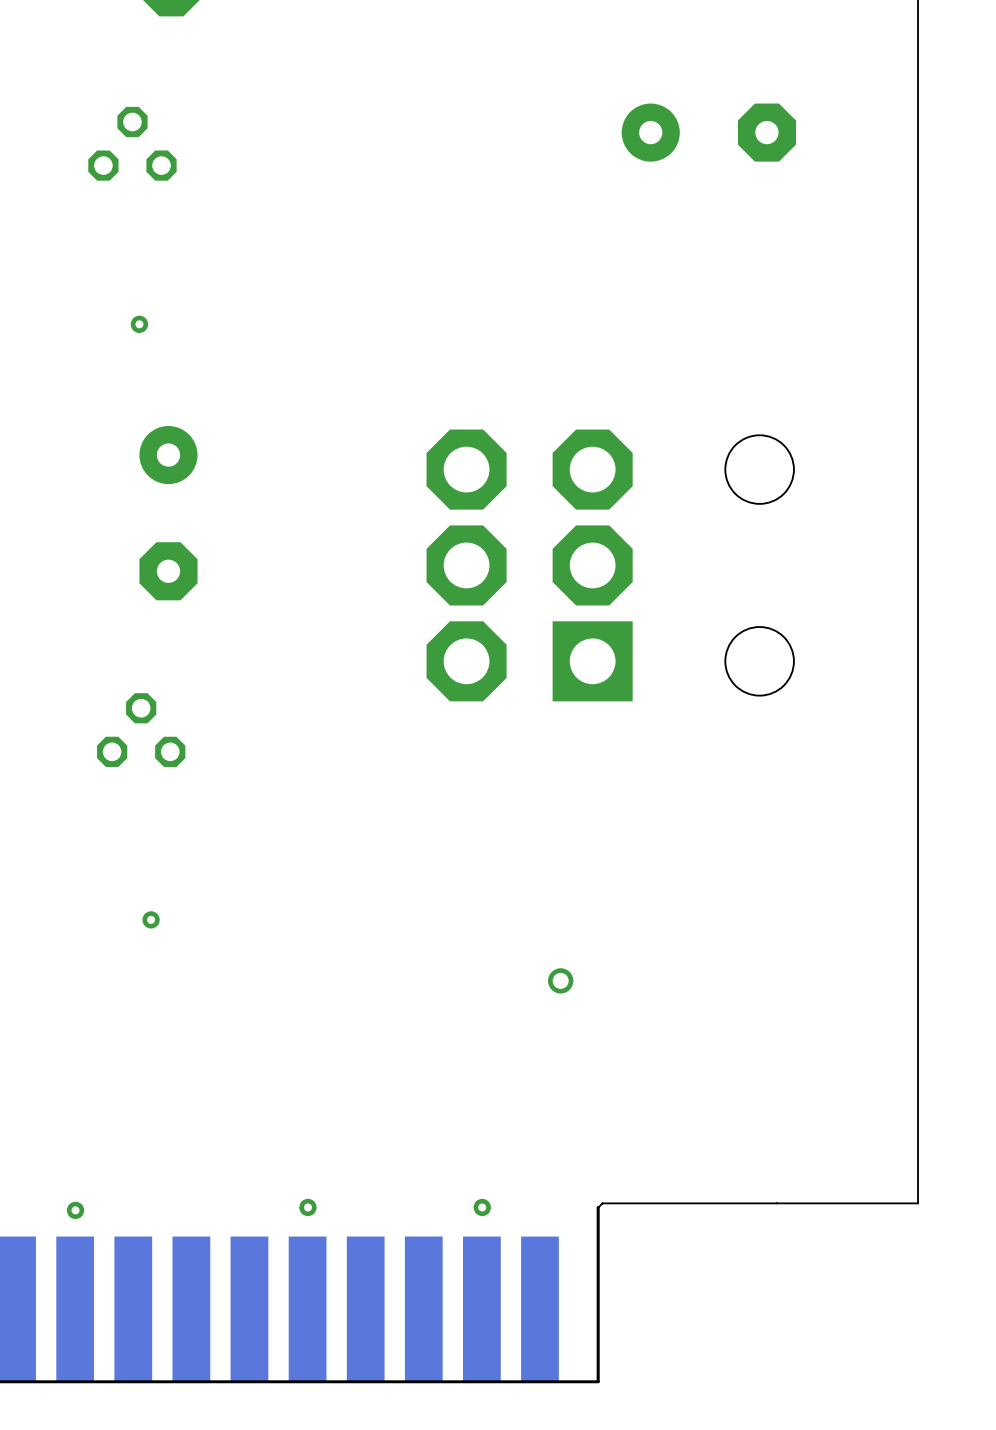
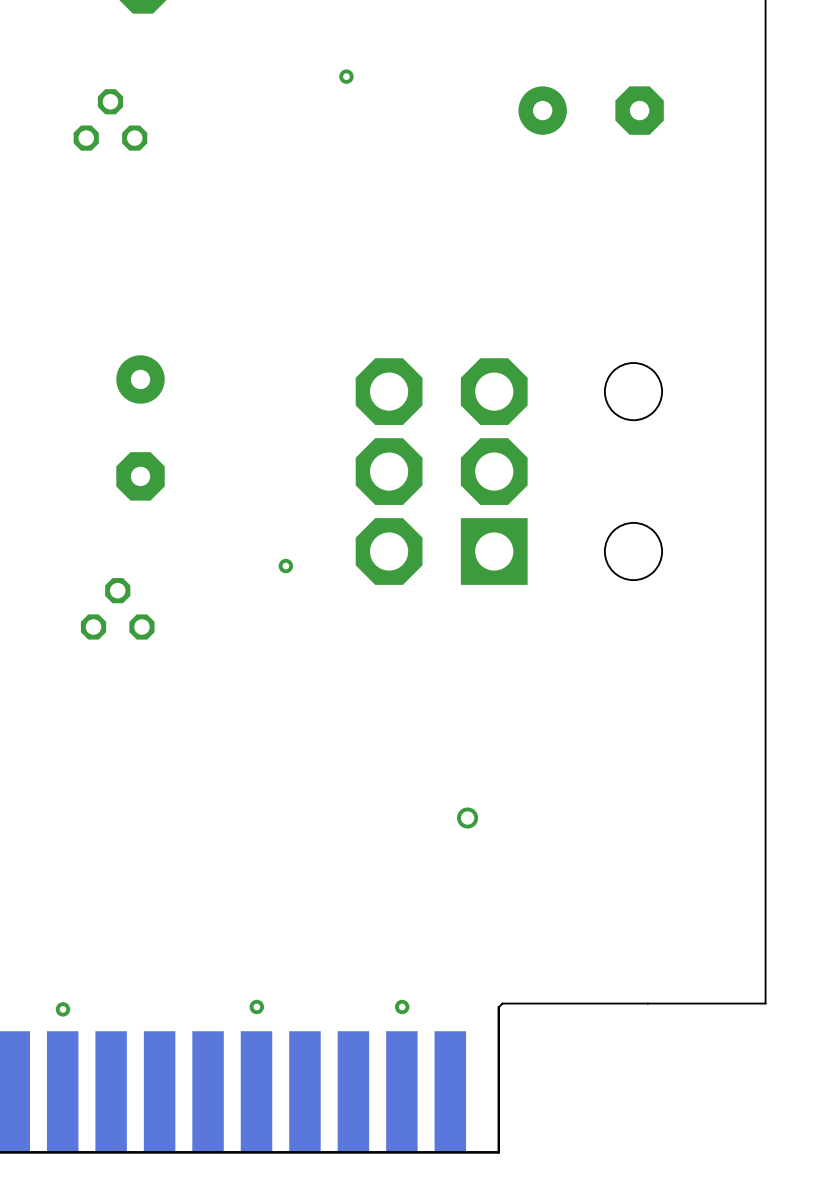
via: none -> (346, 76)
via: (139, 324) -> none
via: none -> (285, 566)
via: (151, 919) -> none

